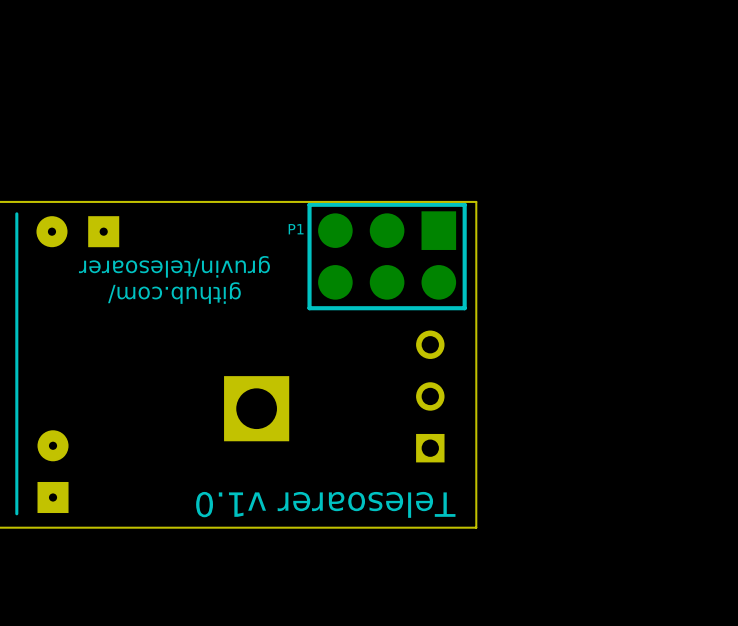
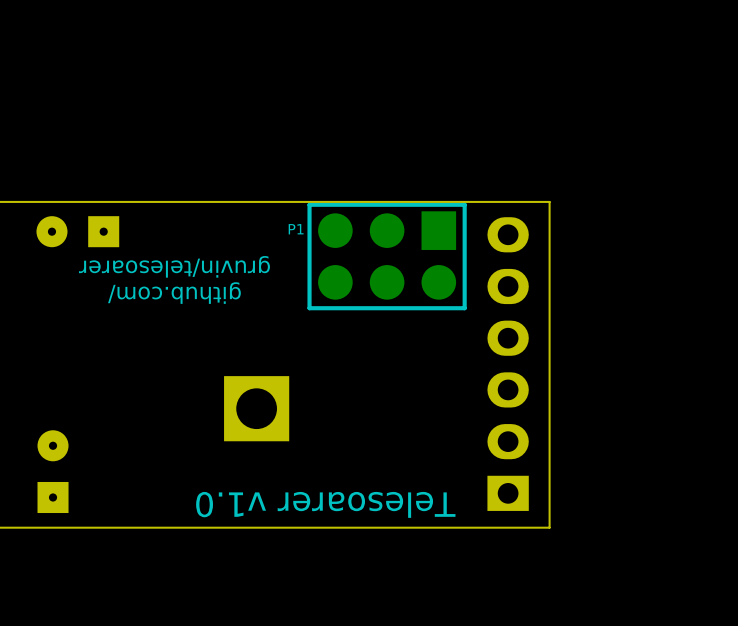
board edge: (476, 201) (476, 527) -> (476, 201) (549, 201) (549, 527) (476, 527)
line: (16, 213) (16, 513) -> none
part: none -> (508, 364)
part: (430, 396) -> none

